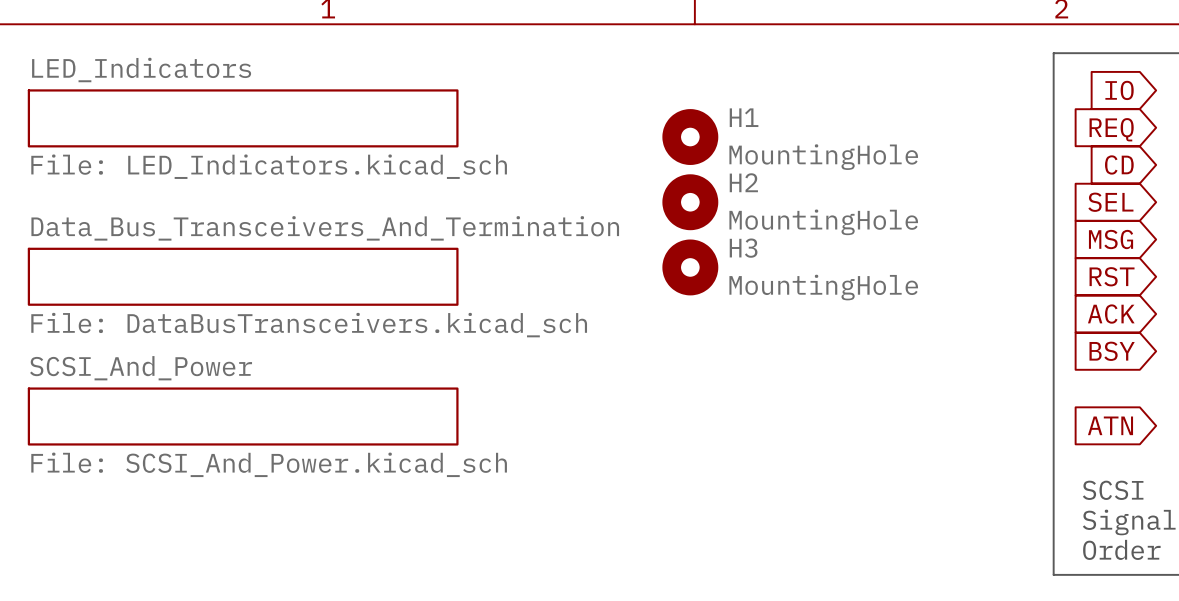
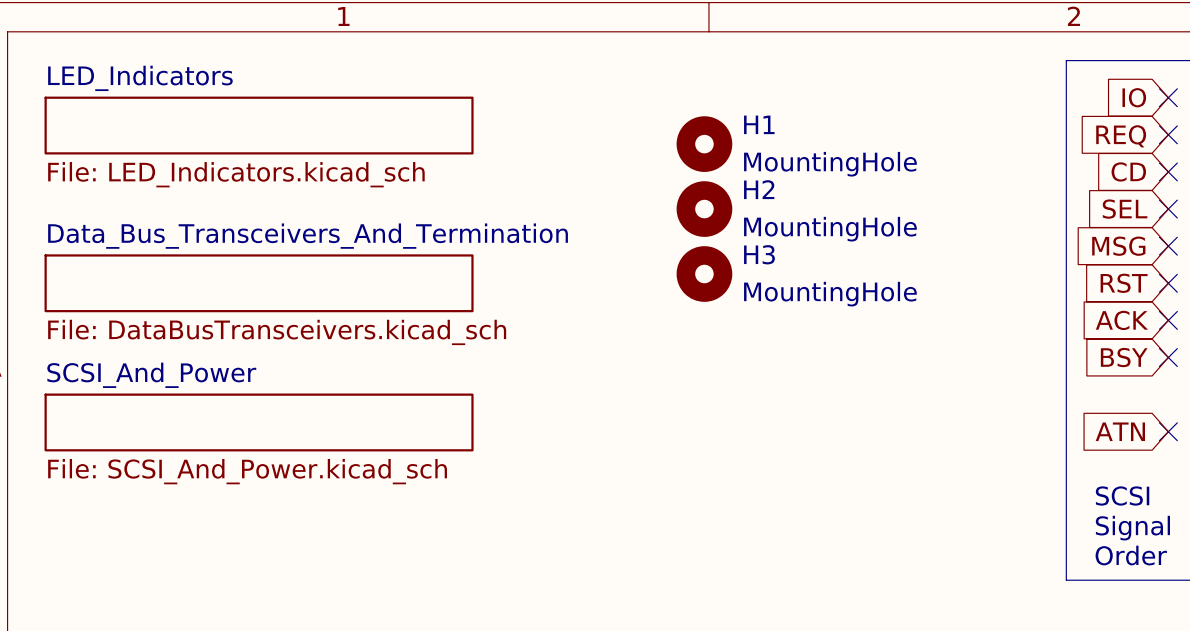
no-connect mark: none -> (1168, 97)
no-connect mark: none -> (1168, 134)
no-connect mark: none -> (1168, 171)
no-connect mark: none -> (1168, 209)
no-connect mark: none -> (1168, 246)
no-connect mark: none -> (1168, 283)
no-connect mark: none -> (1168, 320)
no-connect mark: none -> (1168, 357)
no-connect mark: none -> (1168, 431)

